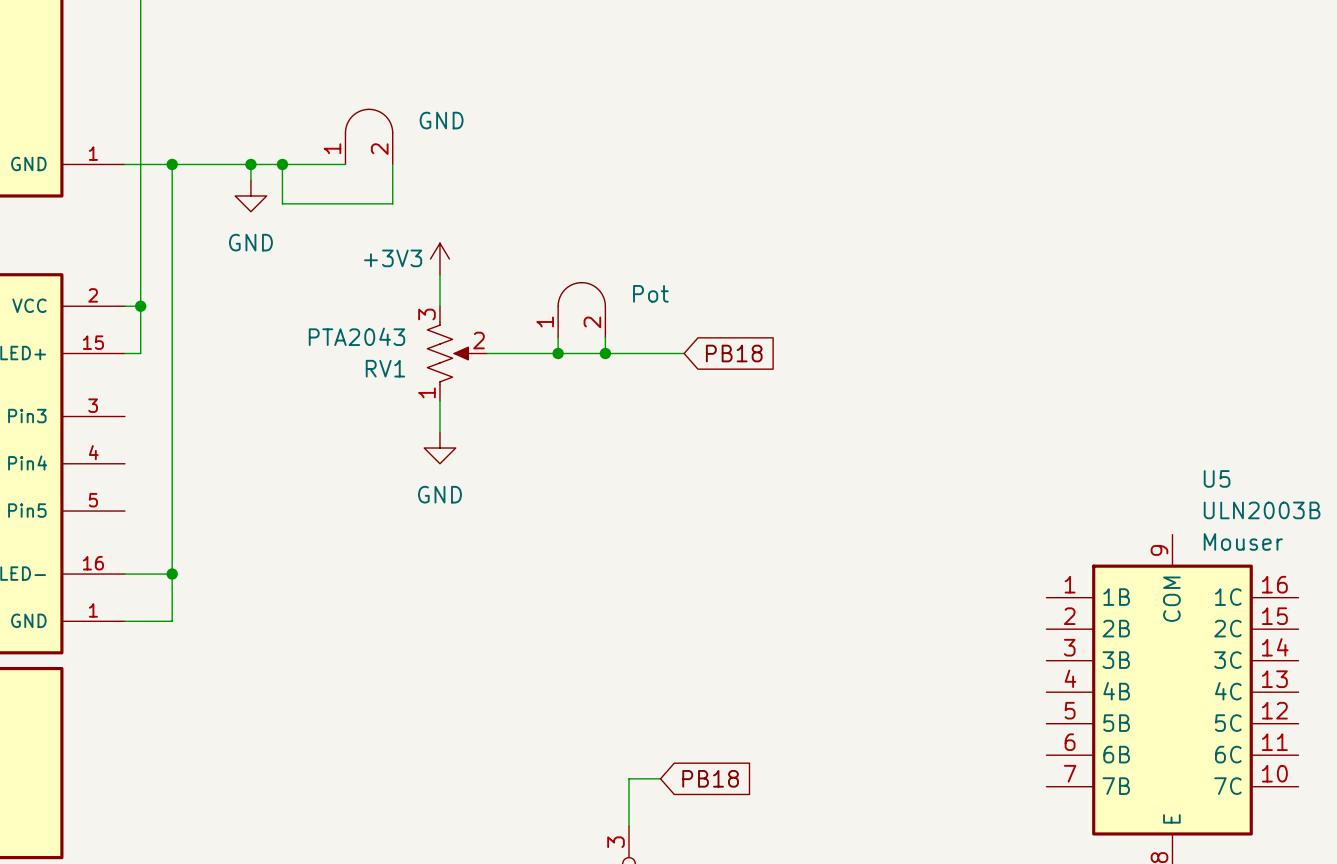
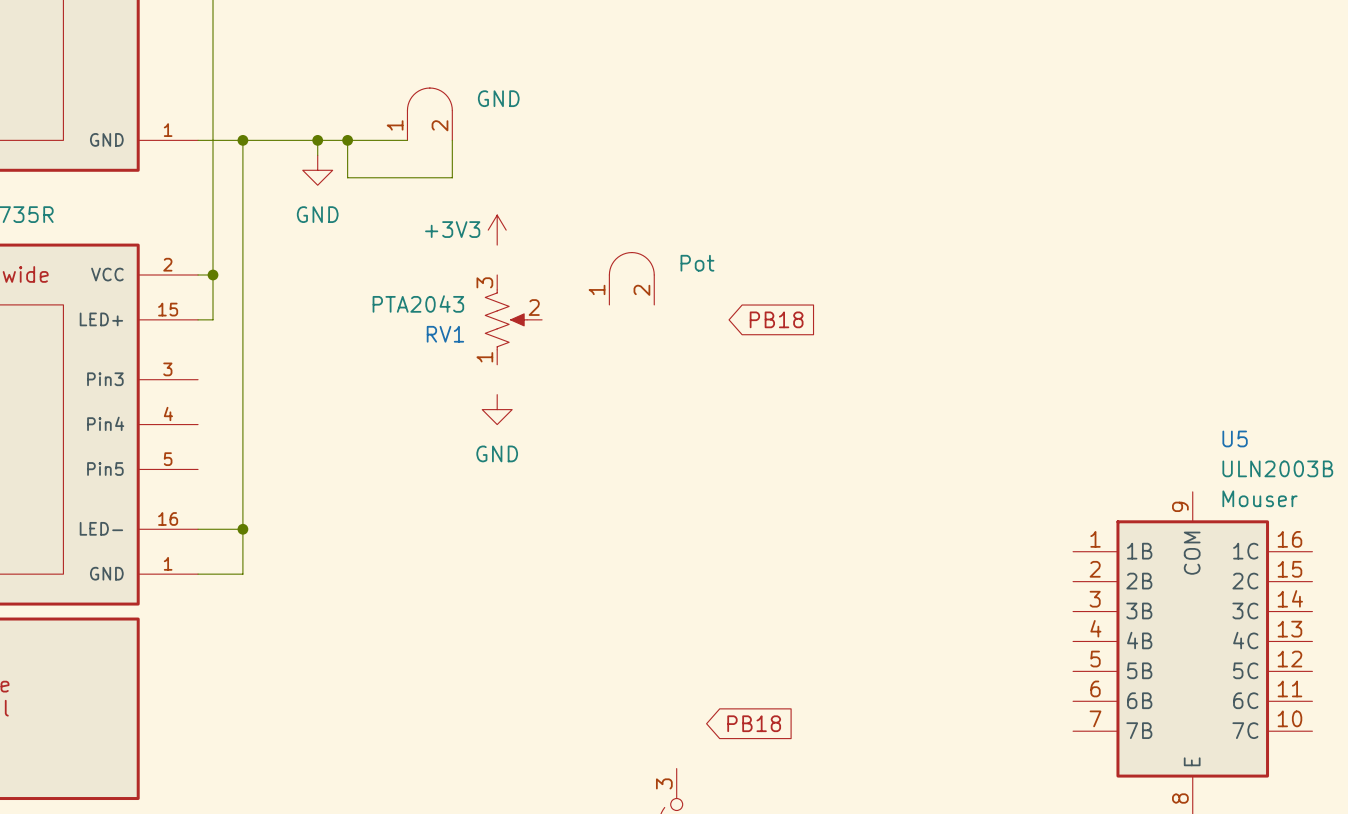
wire: (439, 274) (439, 306) -> none
wire: (558, 337) (558, 353) -> none
wire: (605, 337) (605, 353) -> none
wire: (487, 353) (684, 353) -> none
junction: (558, 353) -> none
junction: (605, 353) -> none
wire: (439, 400) (439, 432) -> none
wire: (660, 778) (629, 778) (629, 826) -> none

